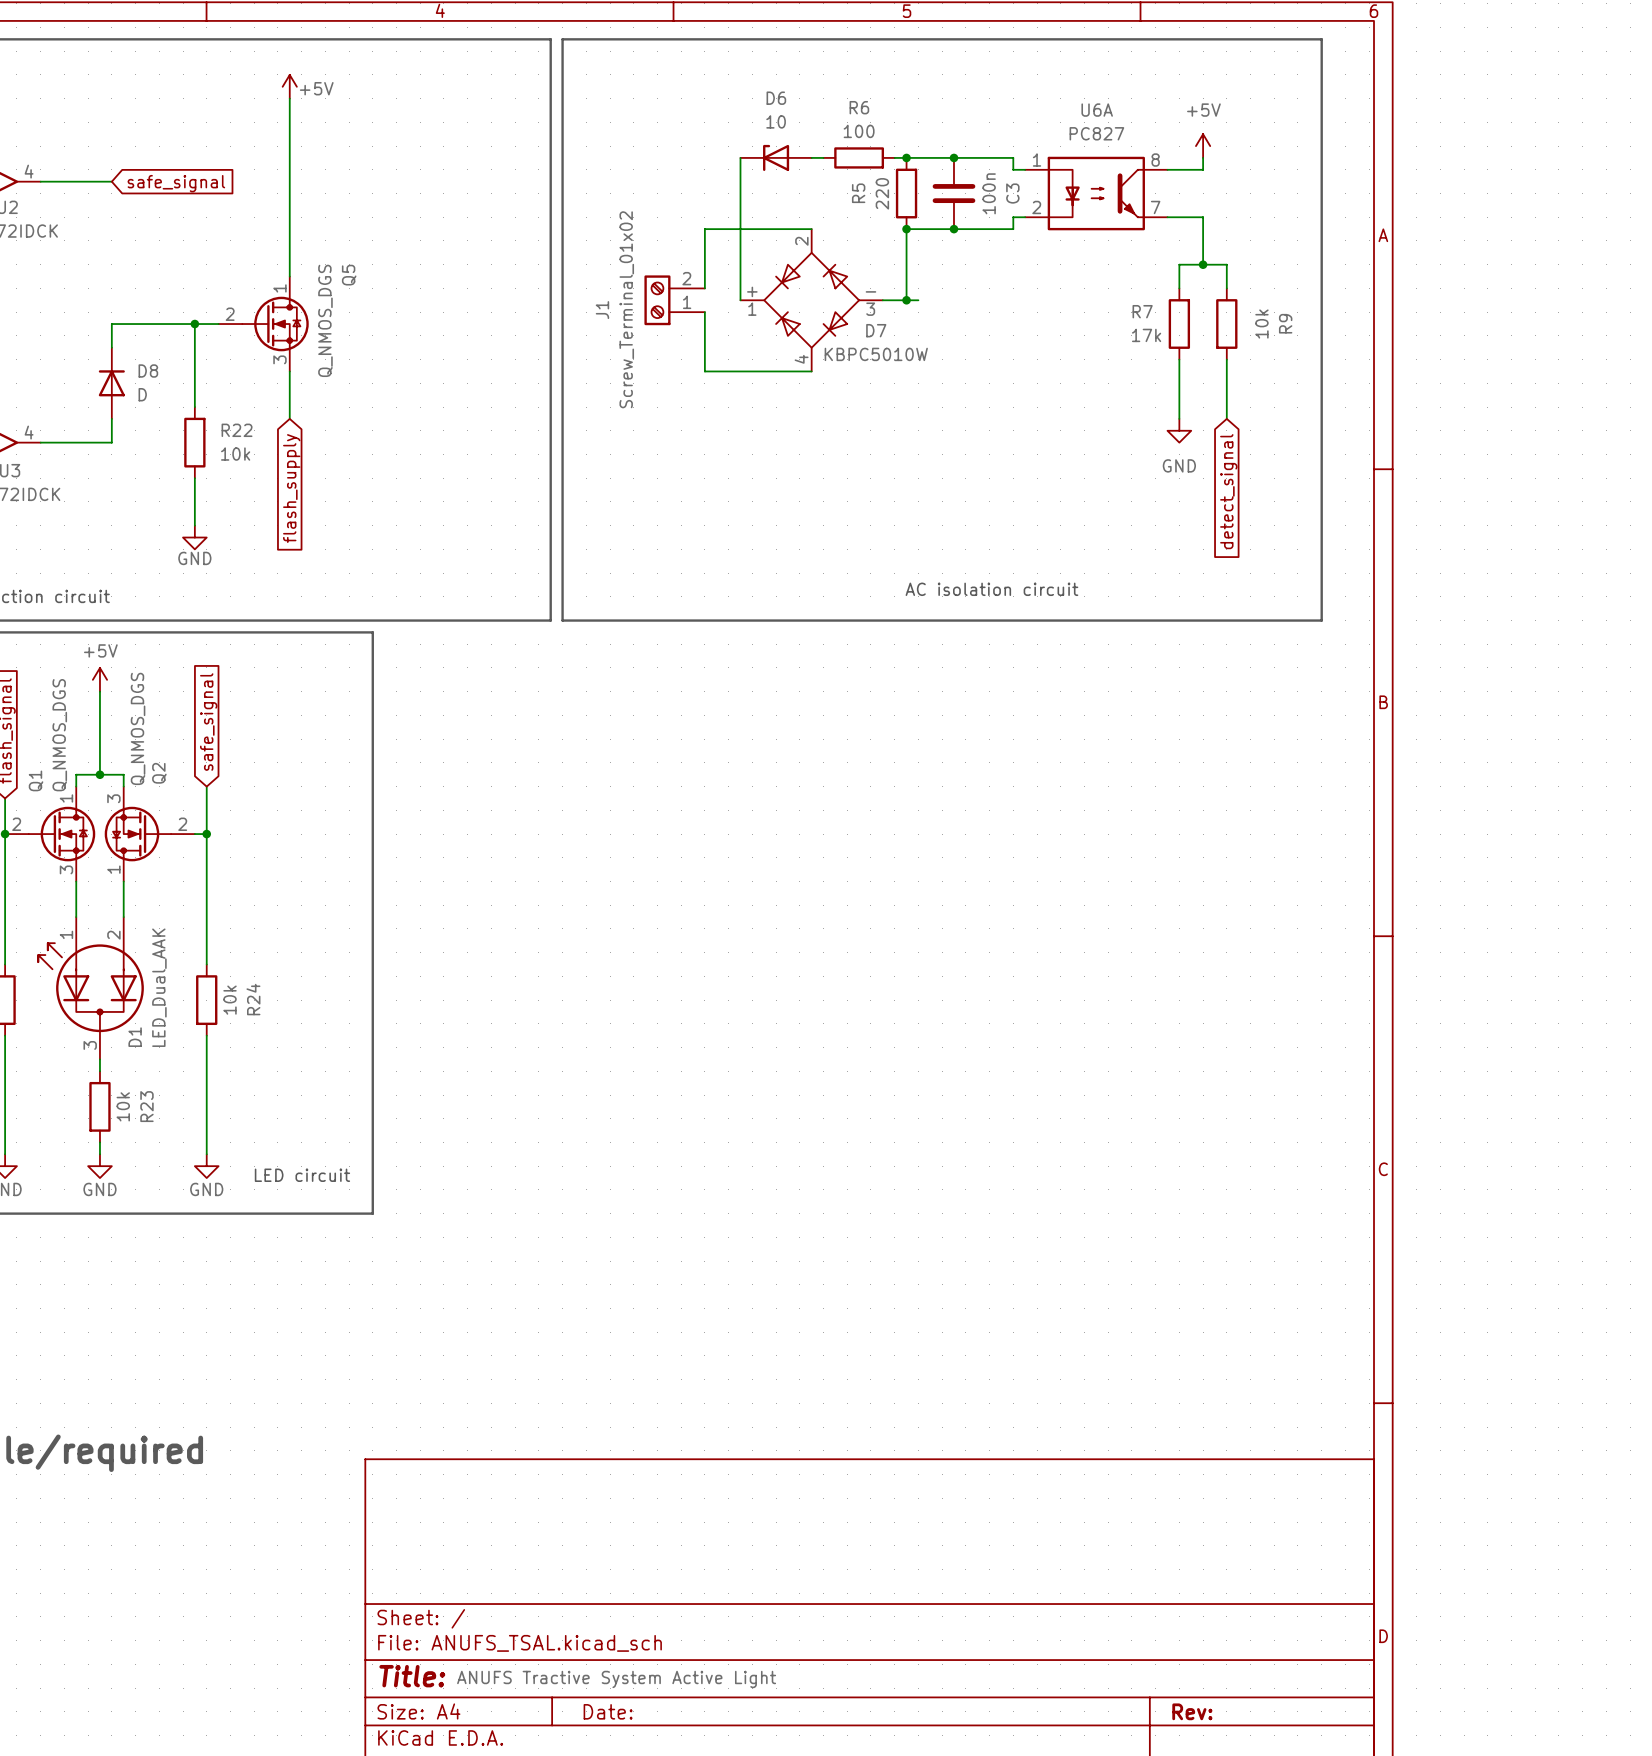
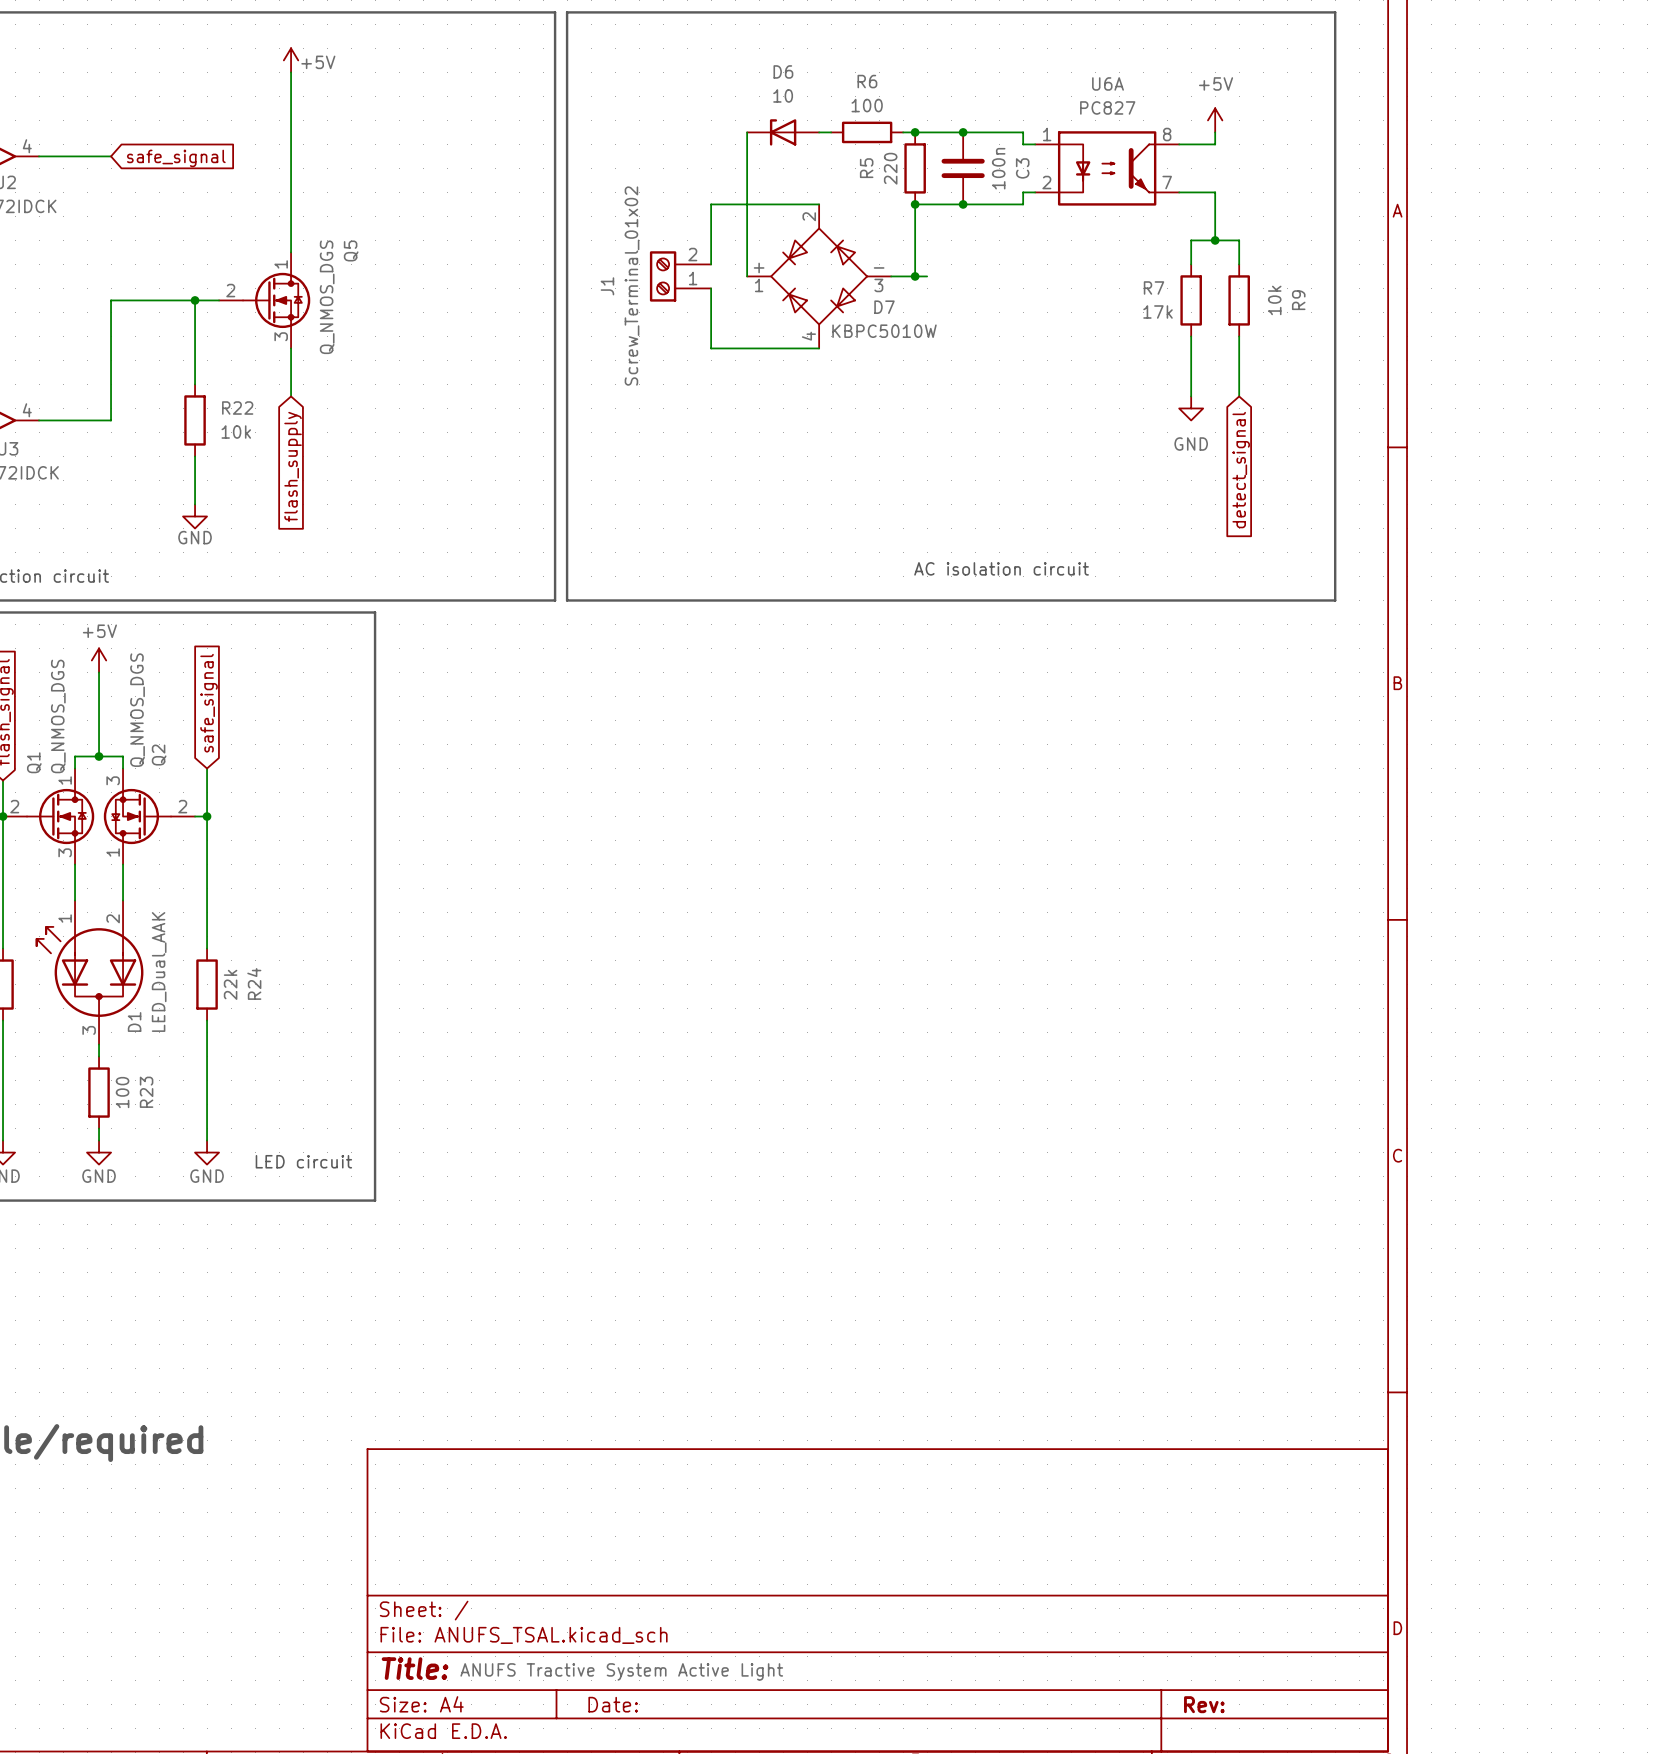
D8: D (111, 383) -> none
R24 value: 10k (230, 1000) -> 22k (230, 984)
R23 value: 10k (123, 1106) -> 100 (122, 1092)

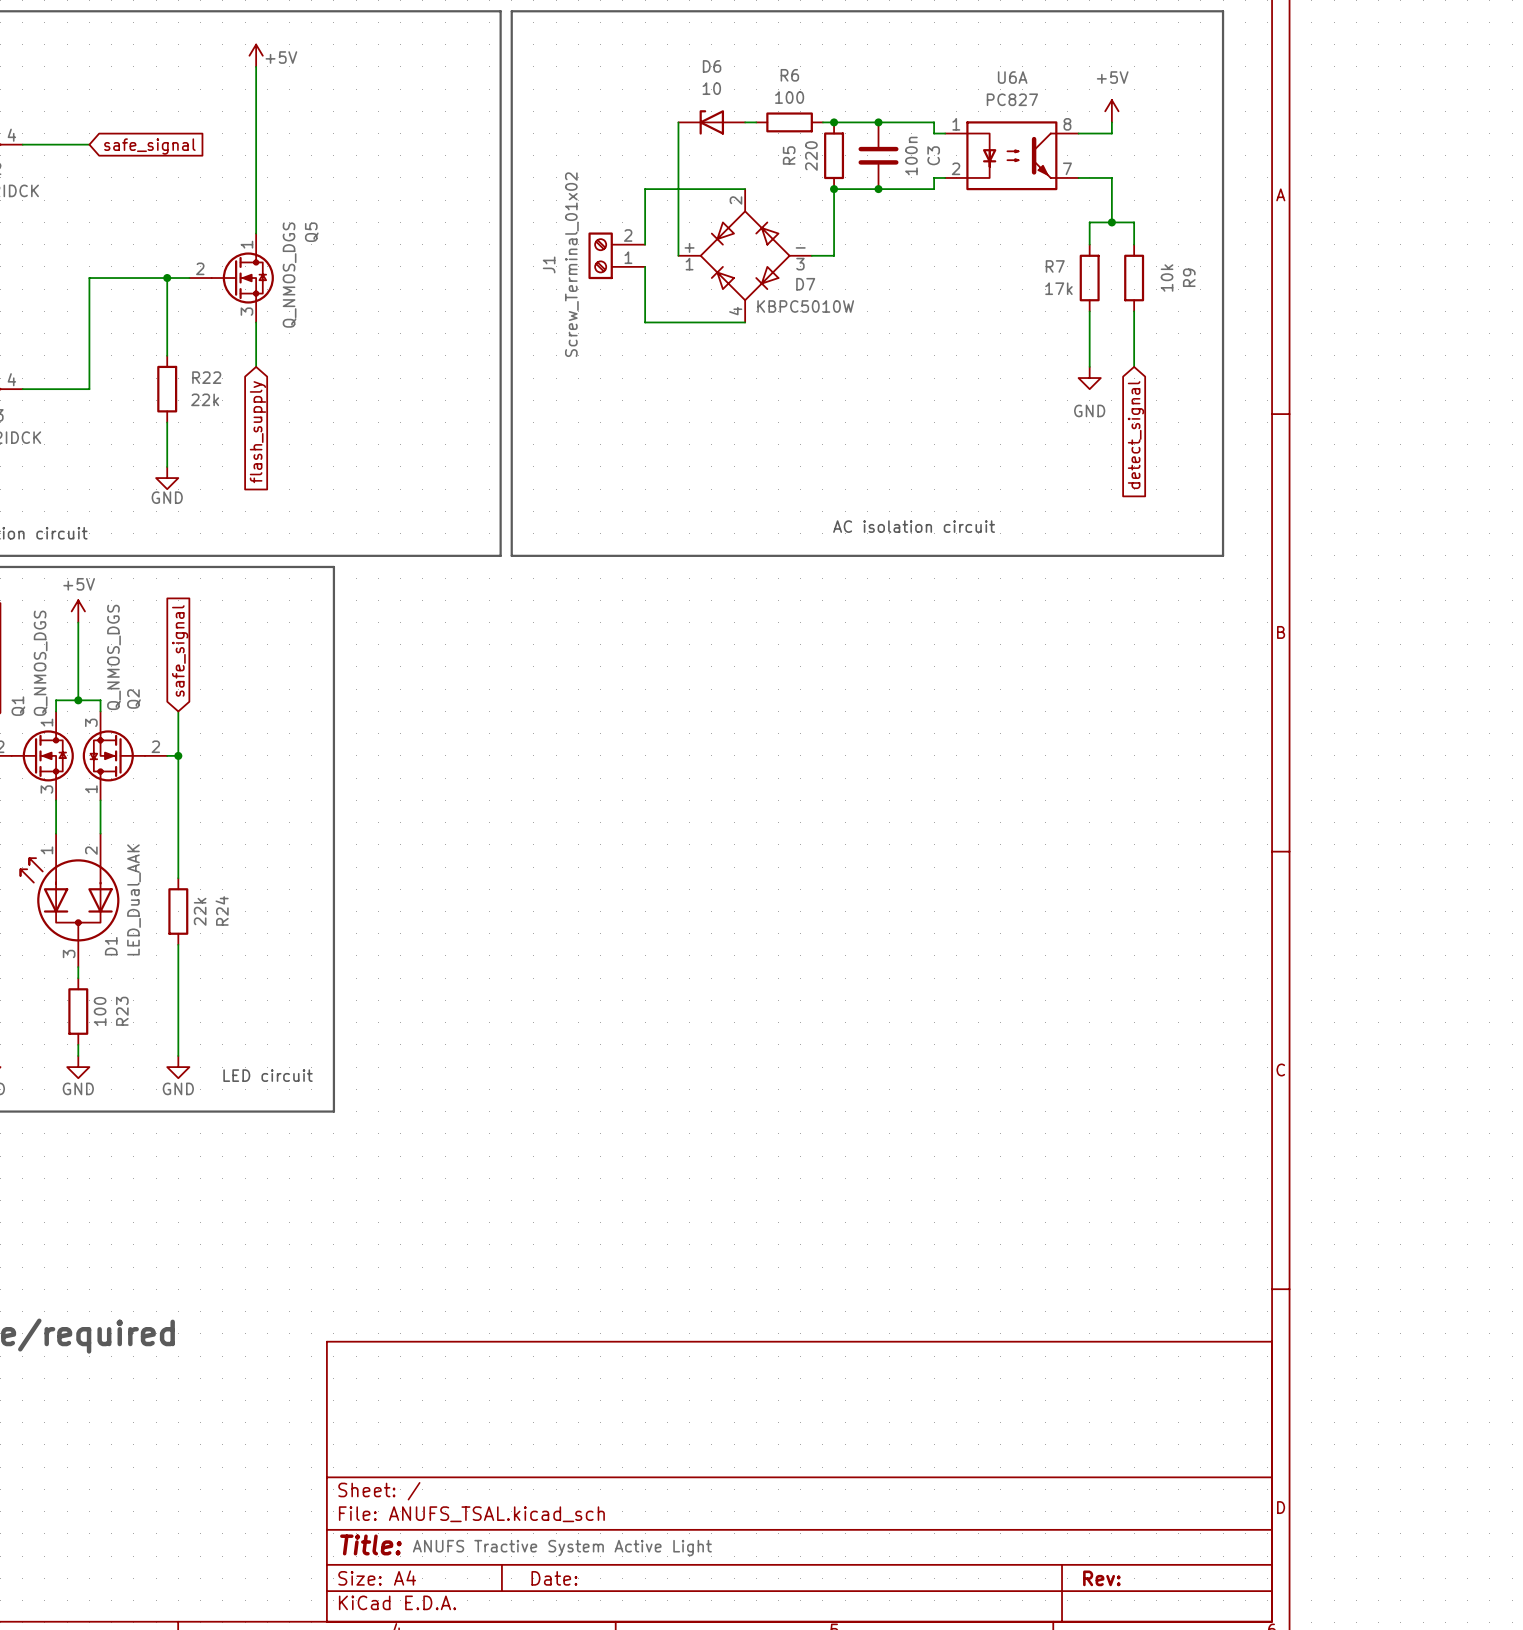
wire: (915, 276) (927, 276) -> none
junction: (915, 276) -> none
R22 value: 10k (236, 432) -> 22k (205, 399)

